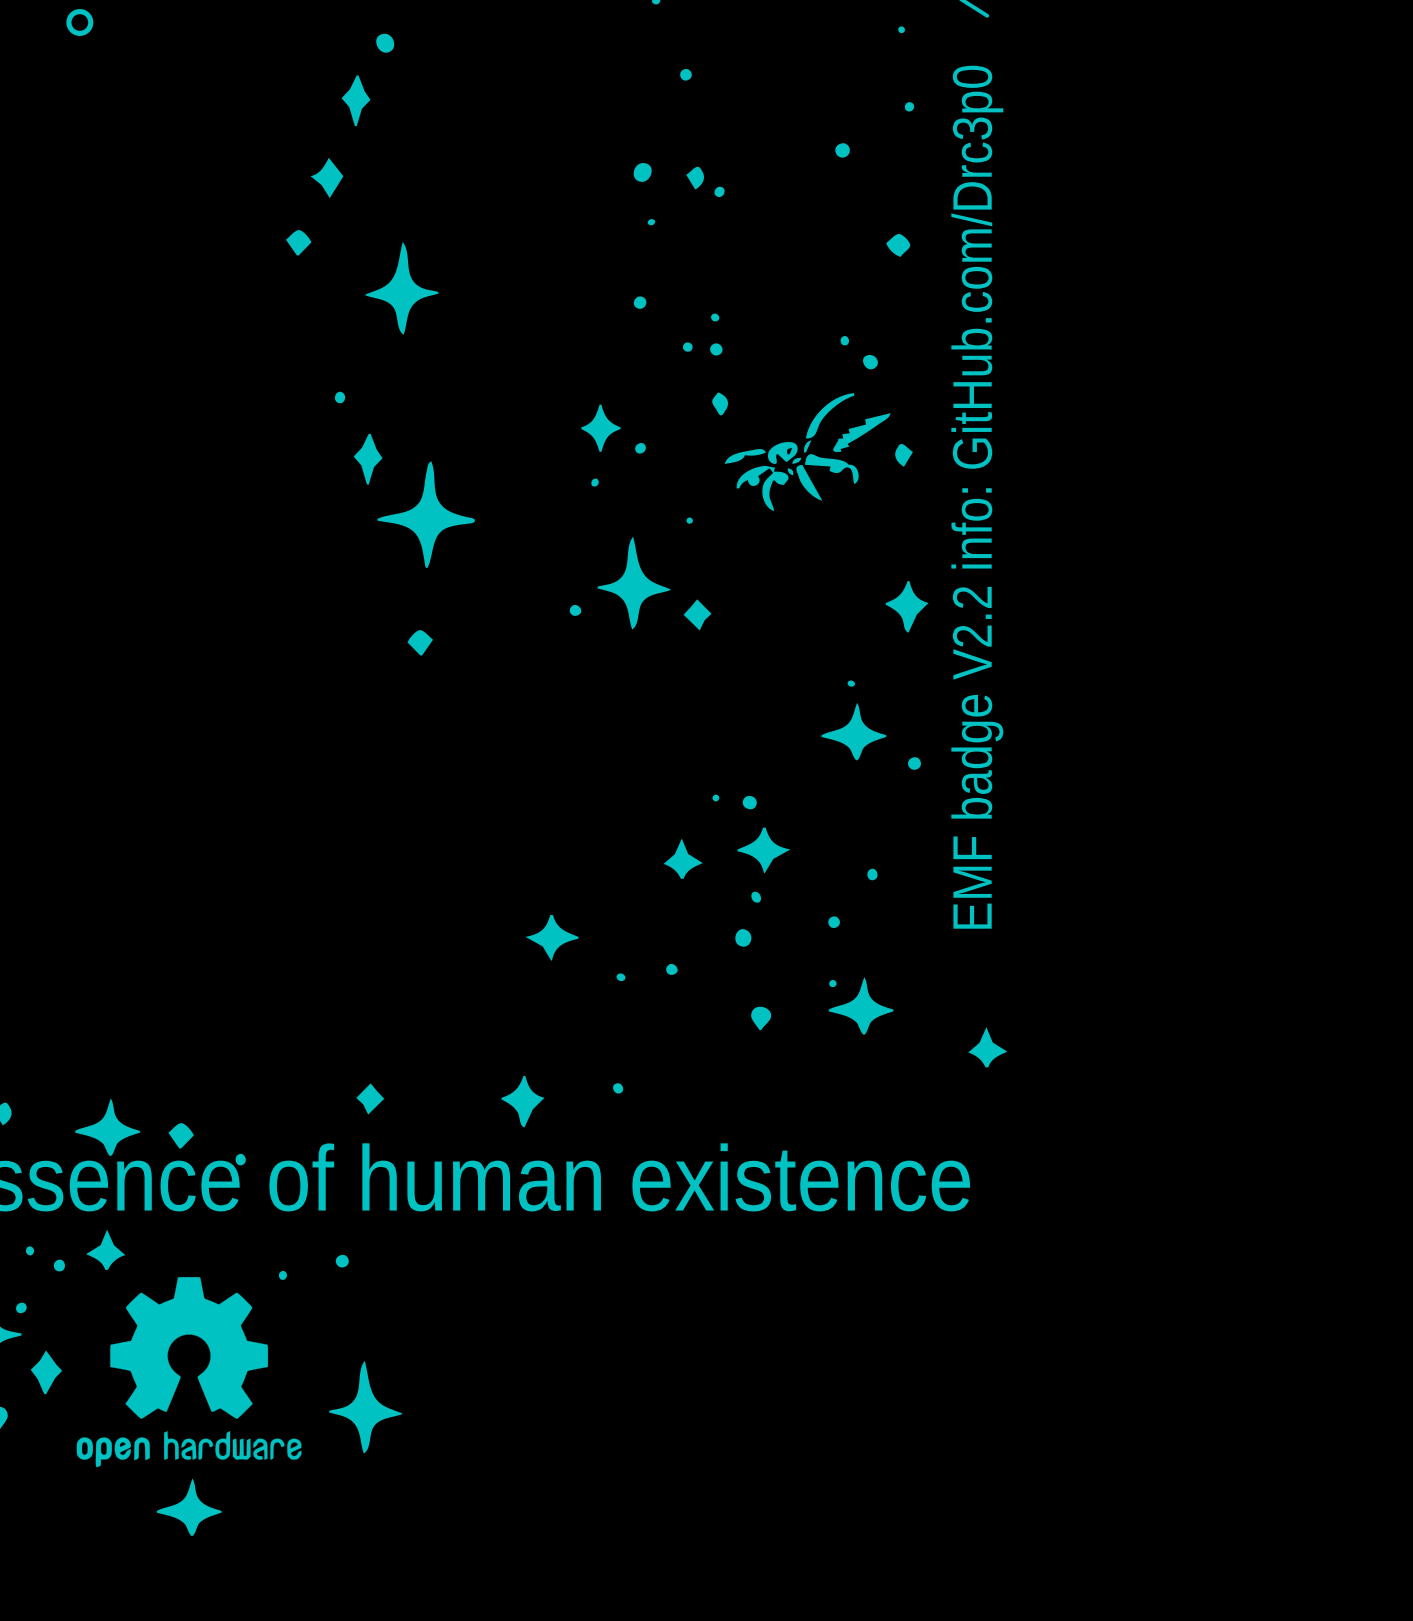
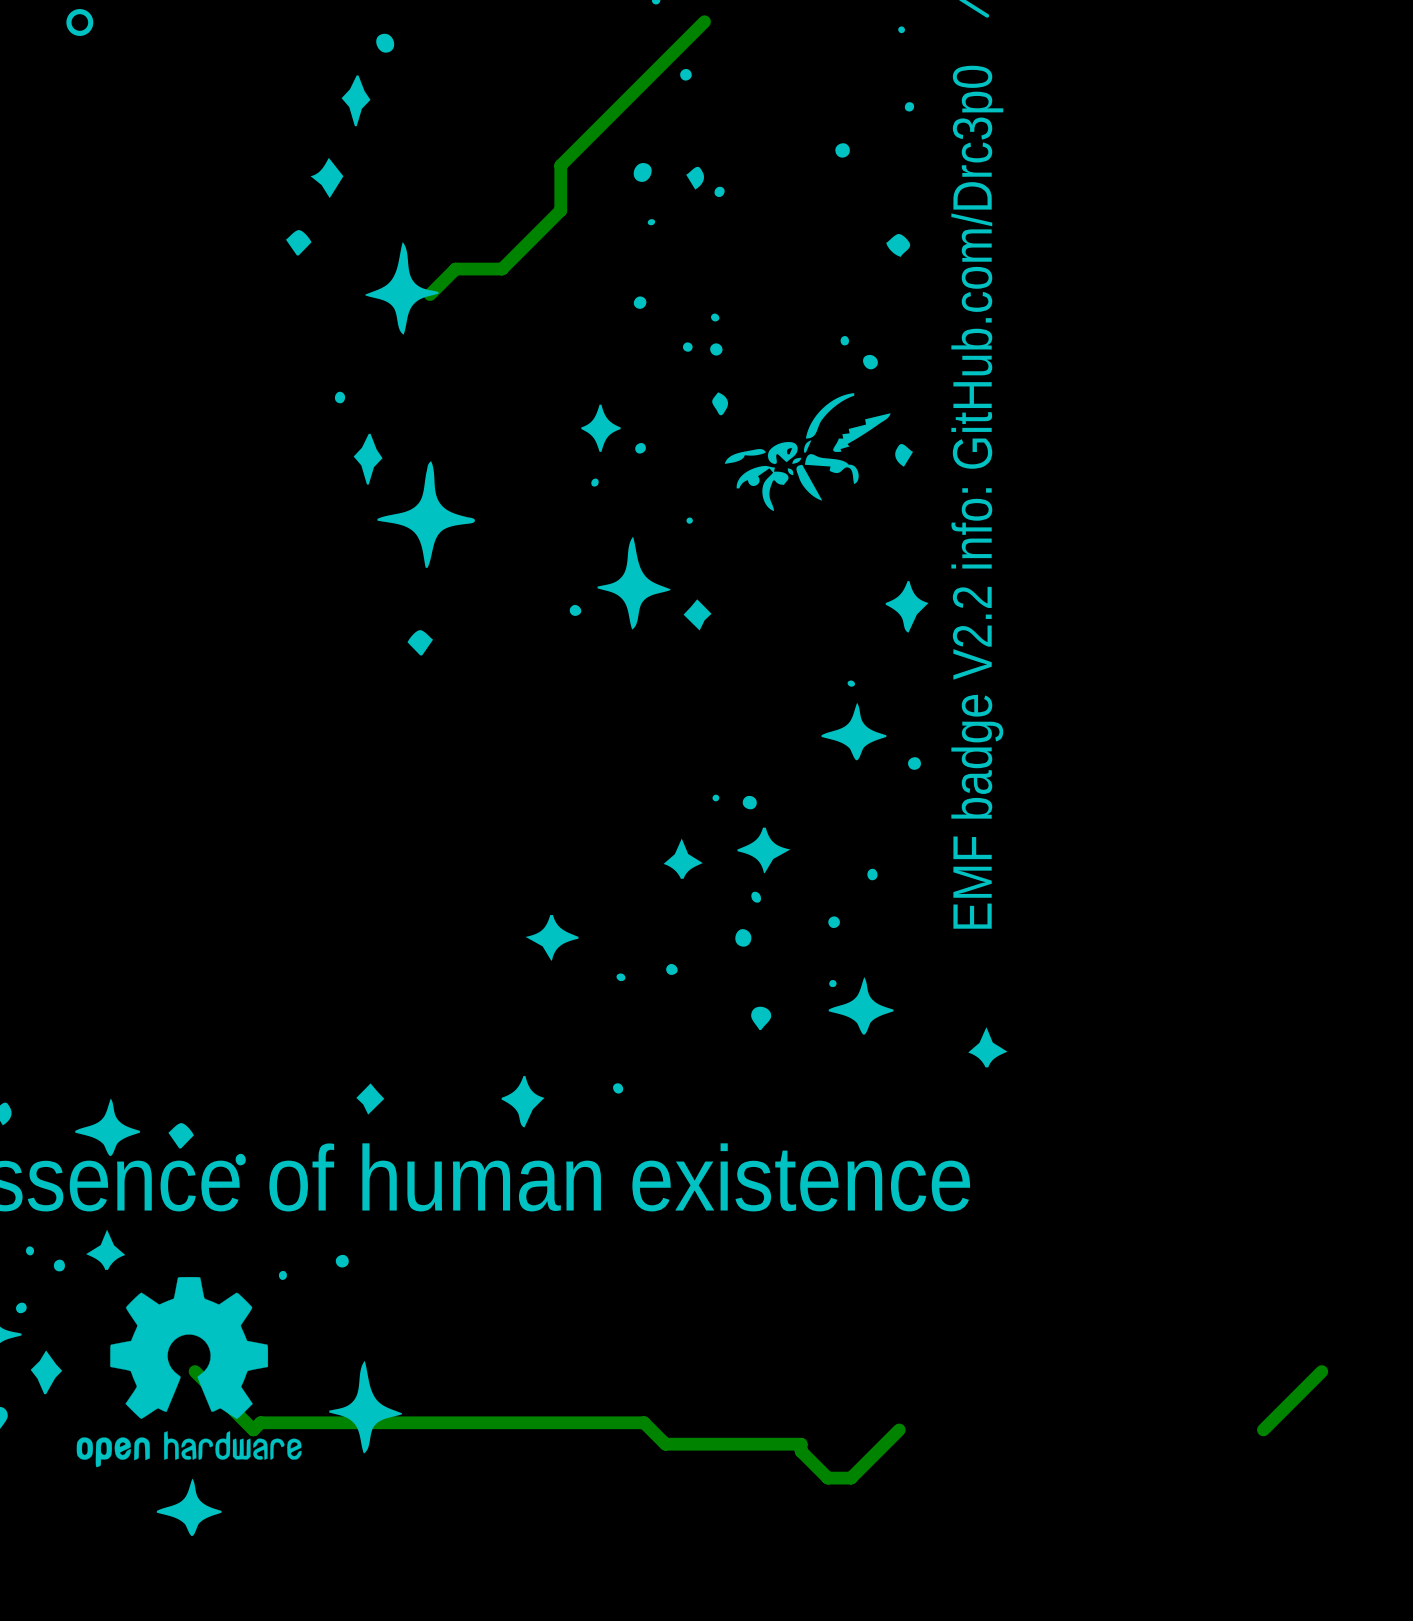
track: none -> (704, 21) (560, 165) (560, 210) (502, 269) (455, 269) (430, 294)
track: none -> (195, 1371) (253, 1429) (260, 1422) (644, 1422) (665, 1444) (801, 1444) (801, 1451) (827, 1478) (851, 1478) (899, 1429)
track: none -> (1321, 1371) (1263, 1429)

